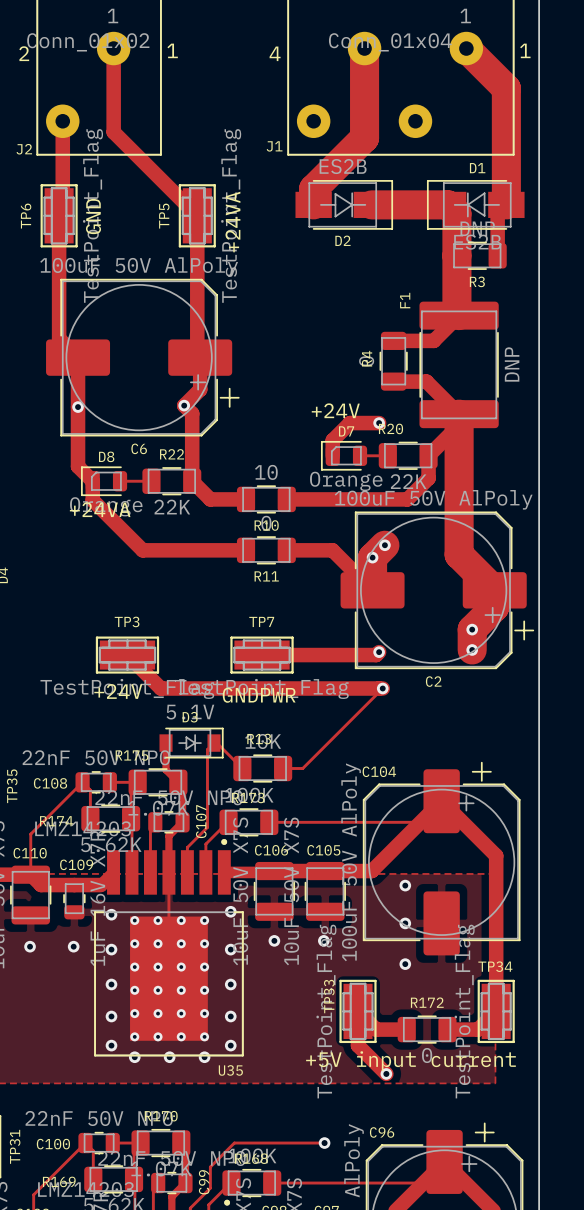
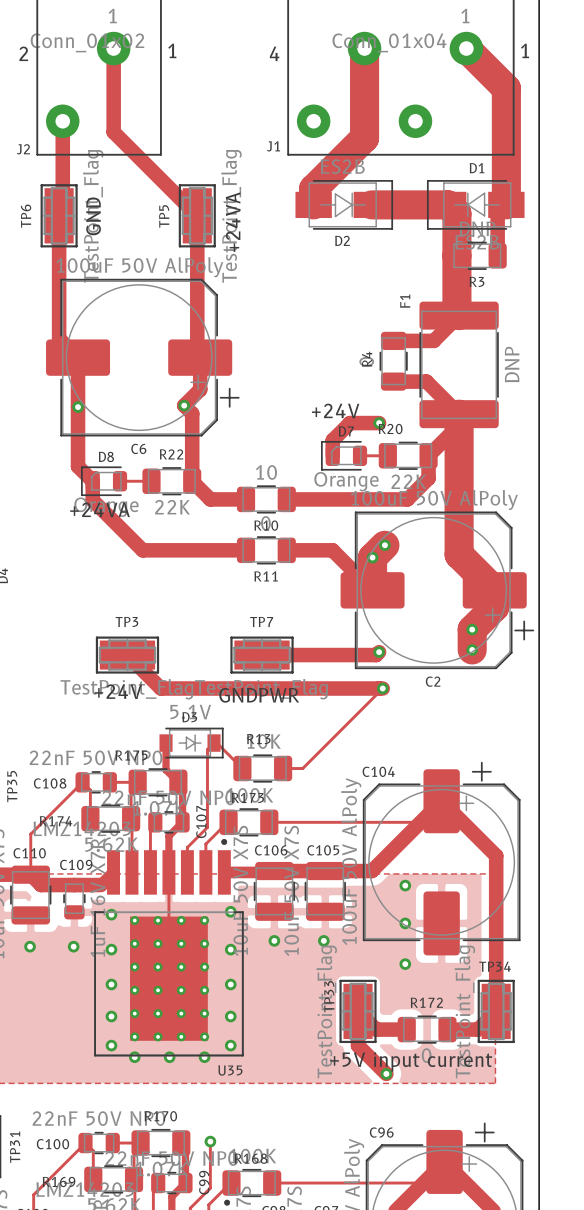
via: none -> (210, 1141)
track: (324, 1143) (234, 1143) (210, 1167) -> (210, 1141) (210, 1167)
via: (324, 1143) -> none

